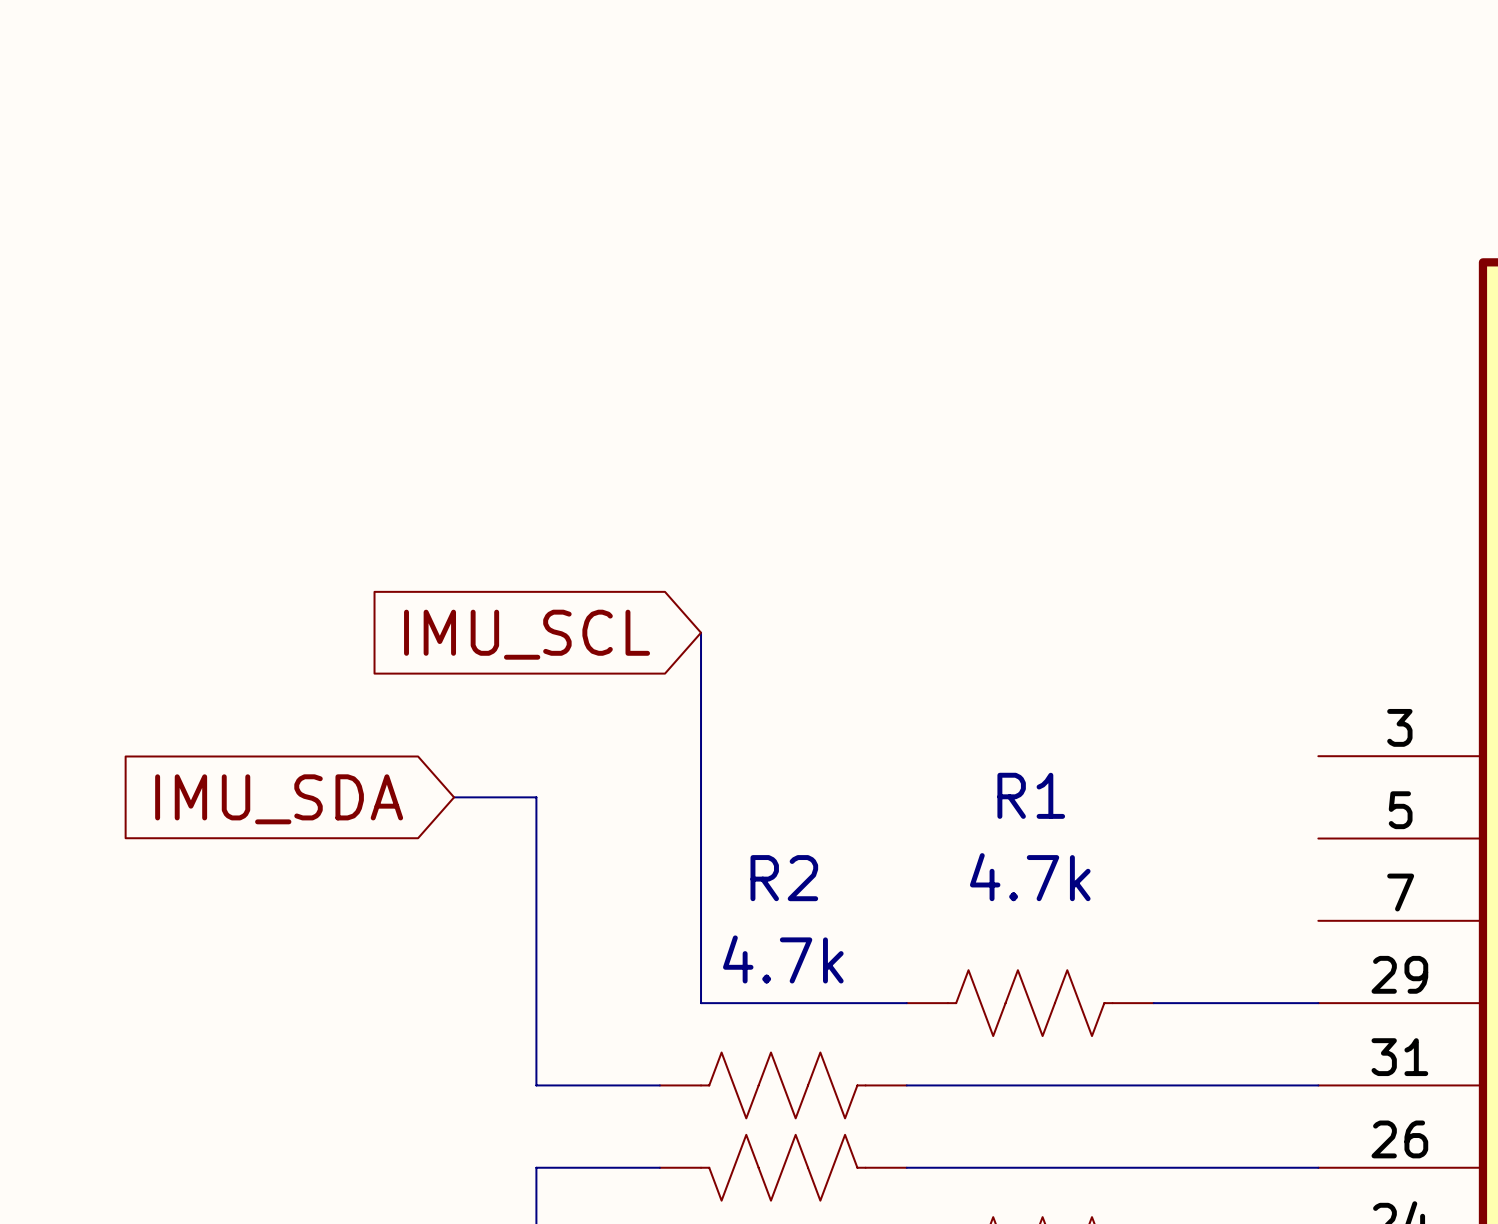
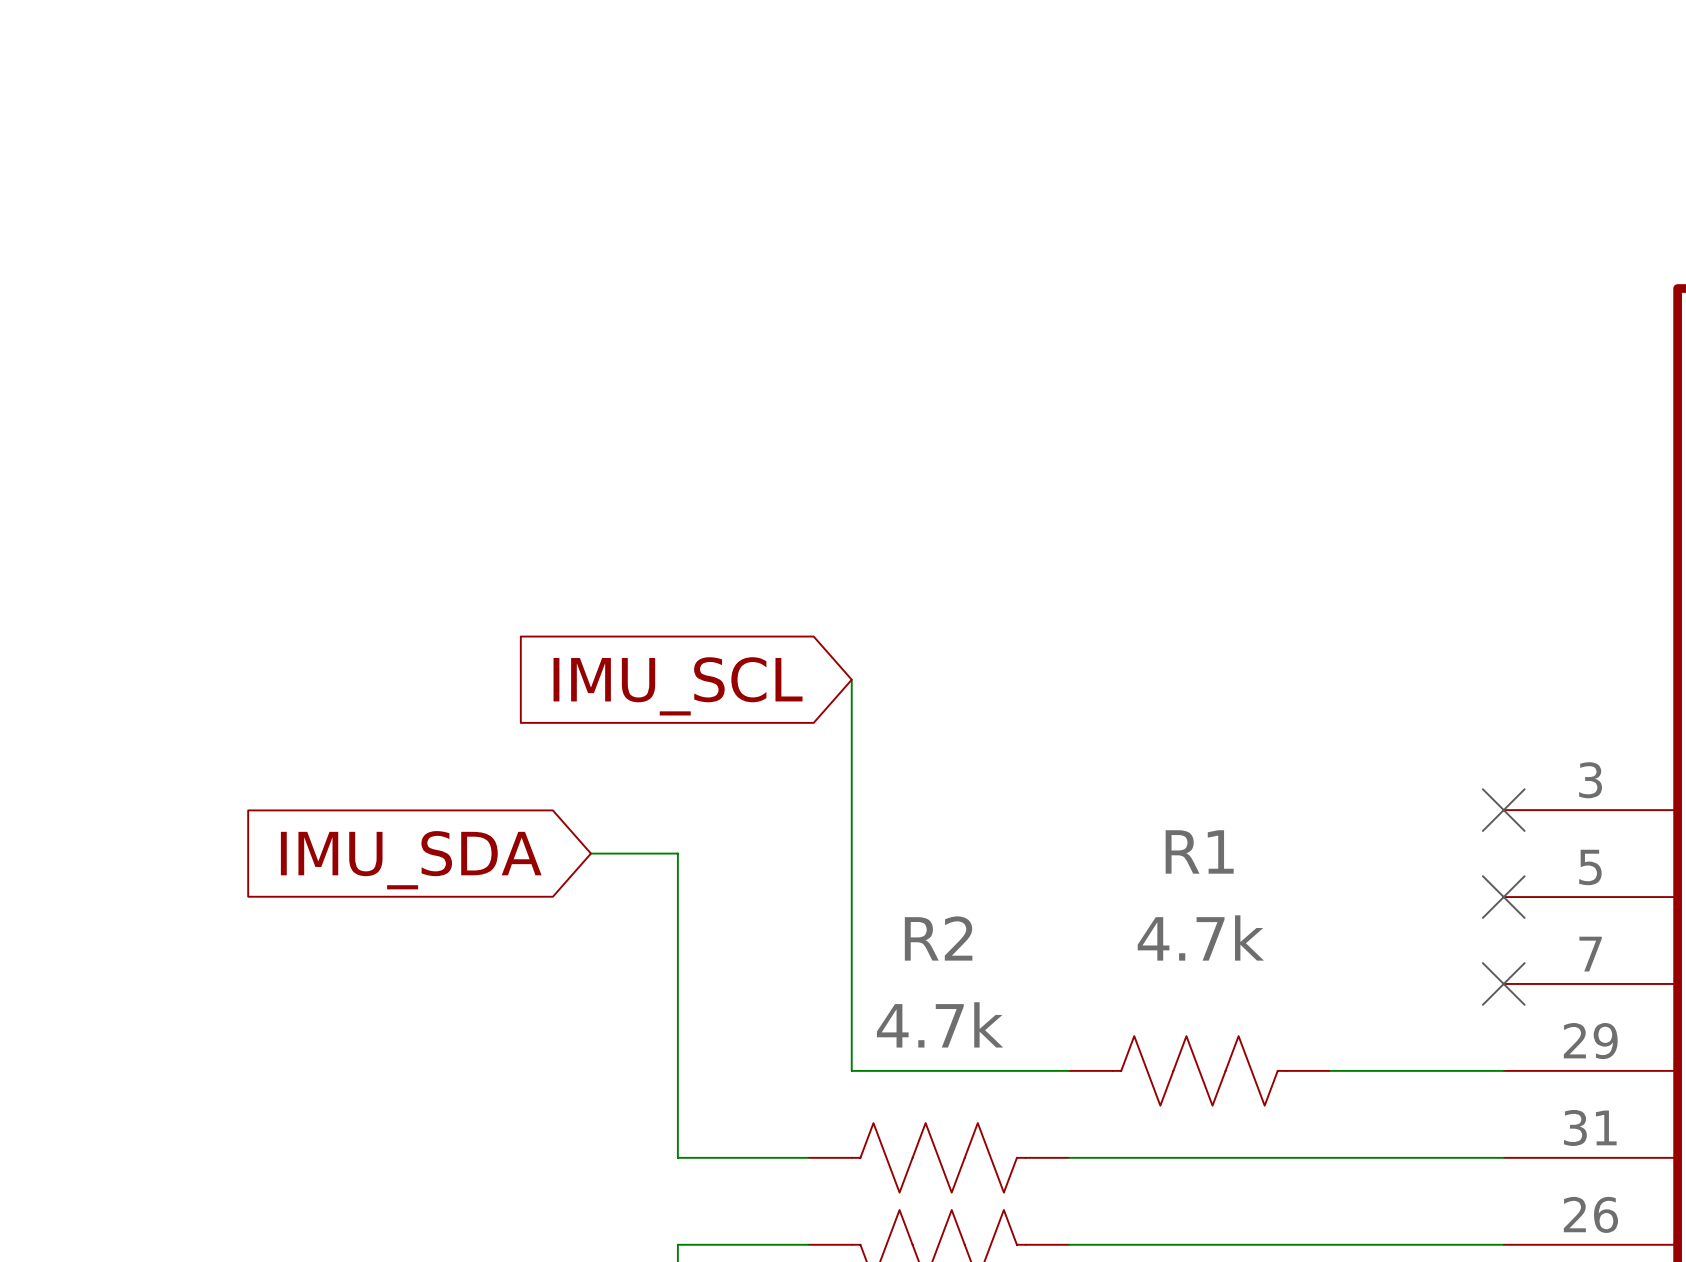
no-connect mark: none -> (1503, 810)
no-connect mark: none -> (1503, 897)
no-connect mark: none -> (1503, 983)

